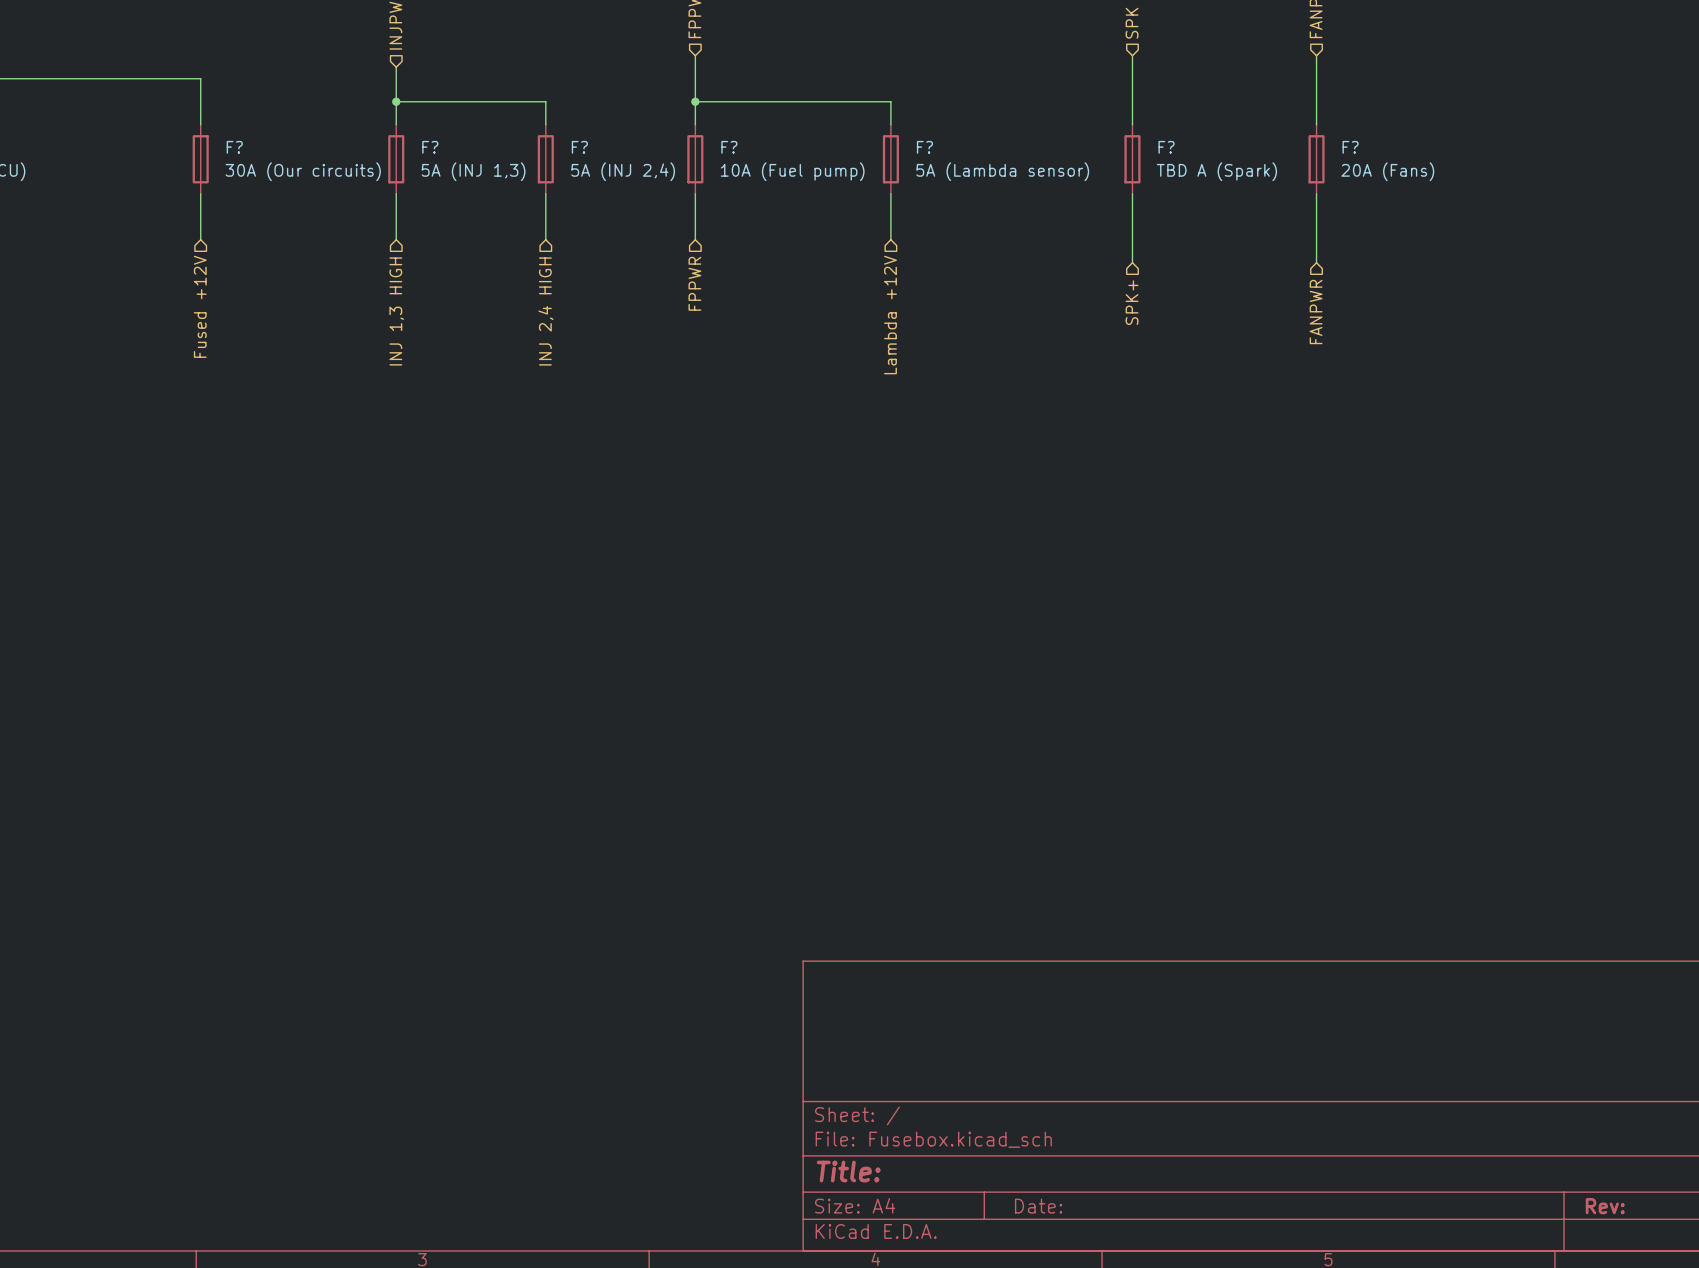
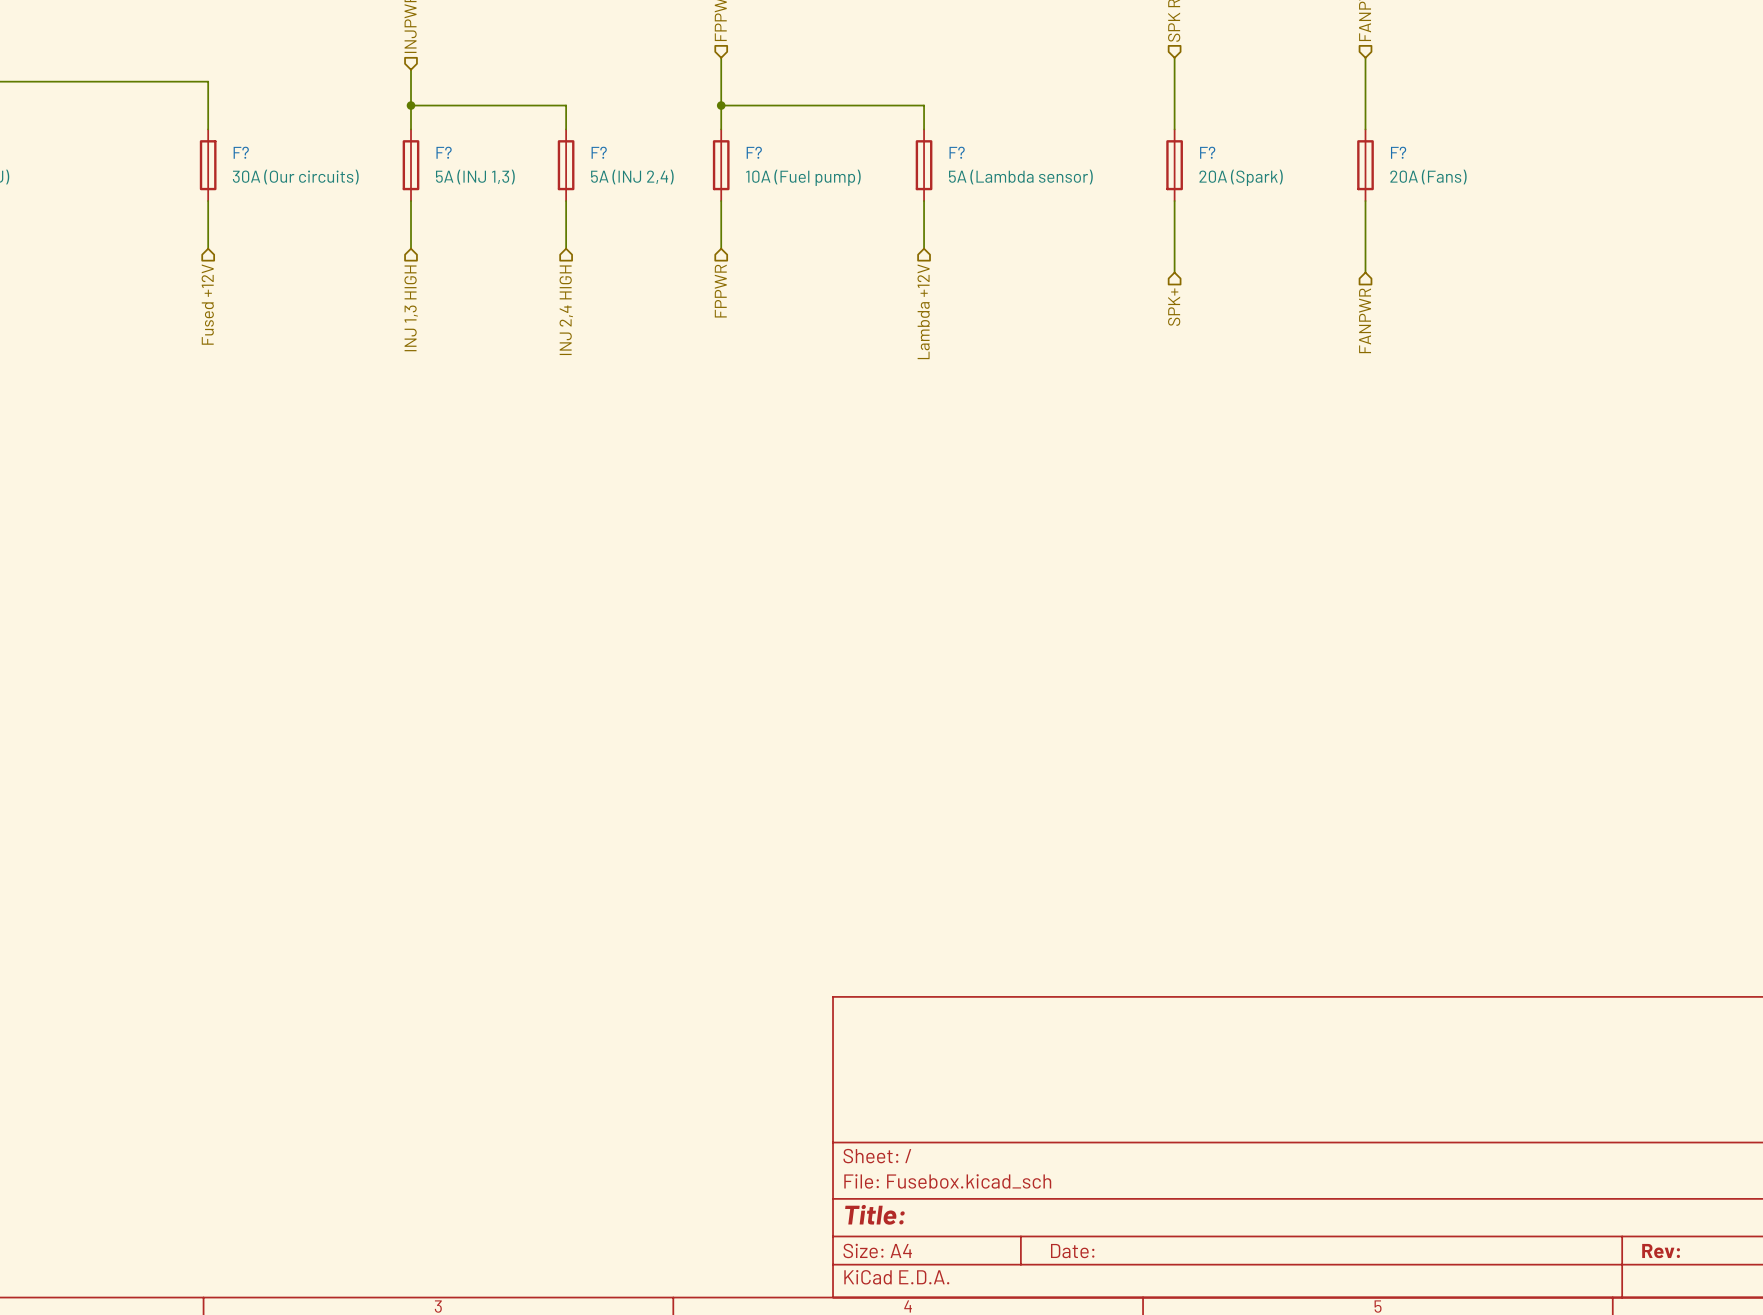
F? value: TBD A (Spark) (1216, 171) -> 20A (Spark) (1241, 177)

